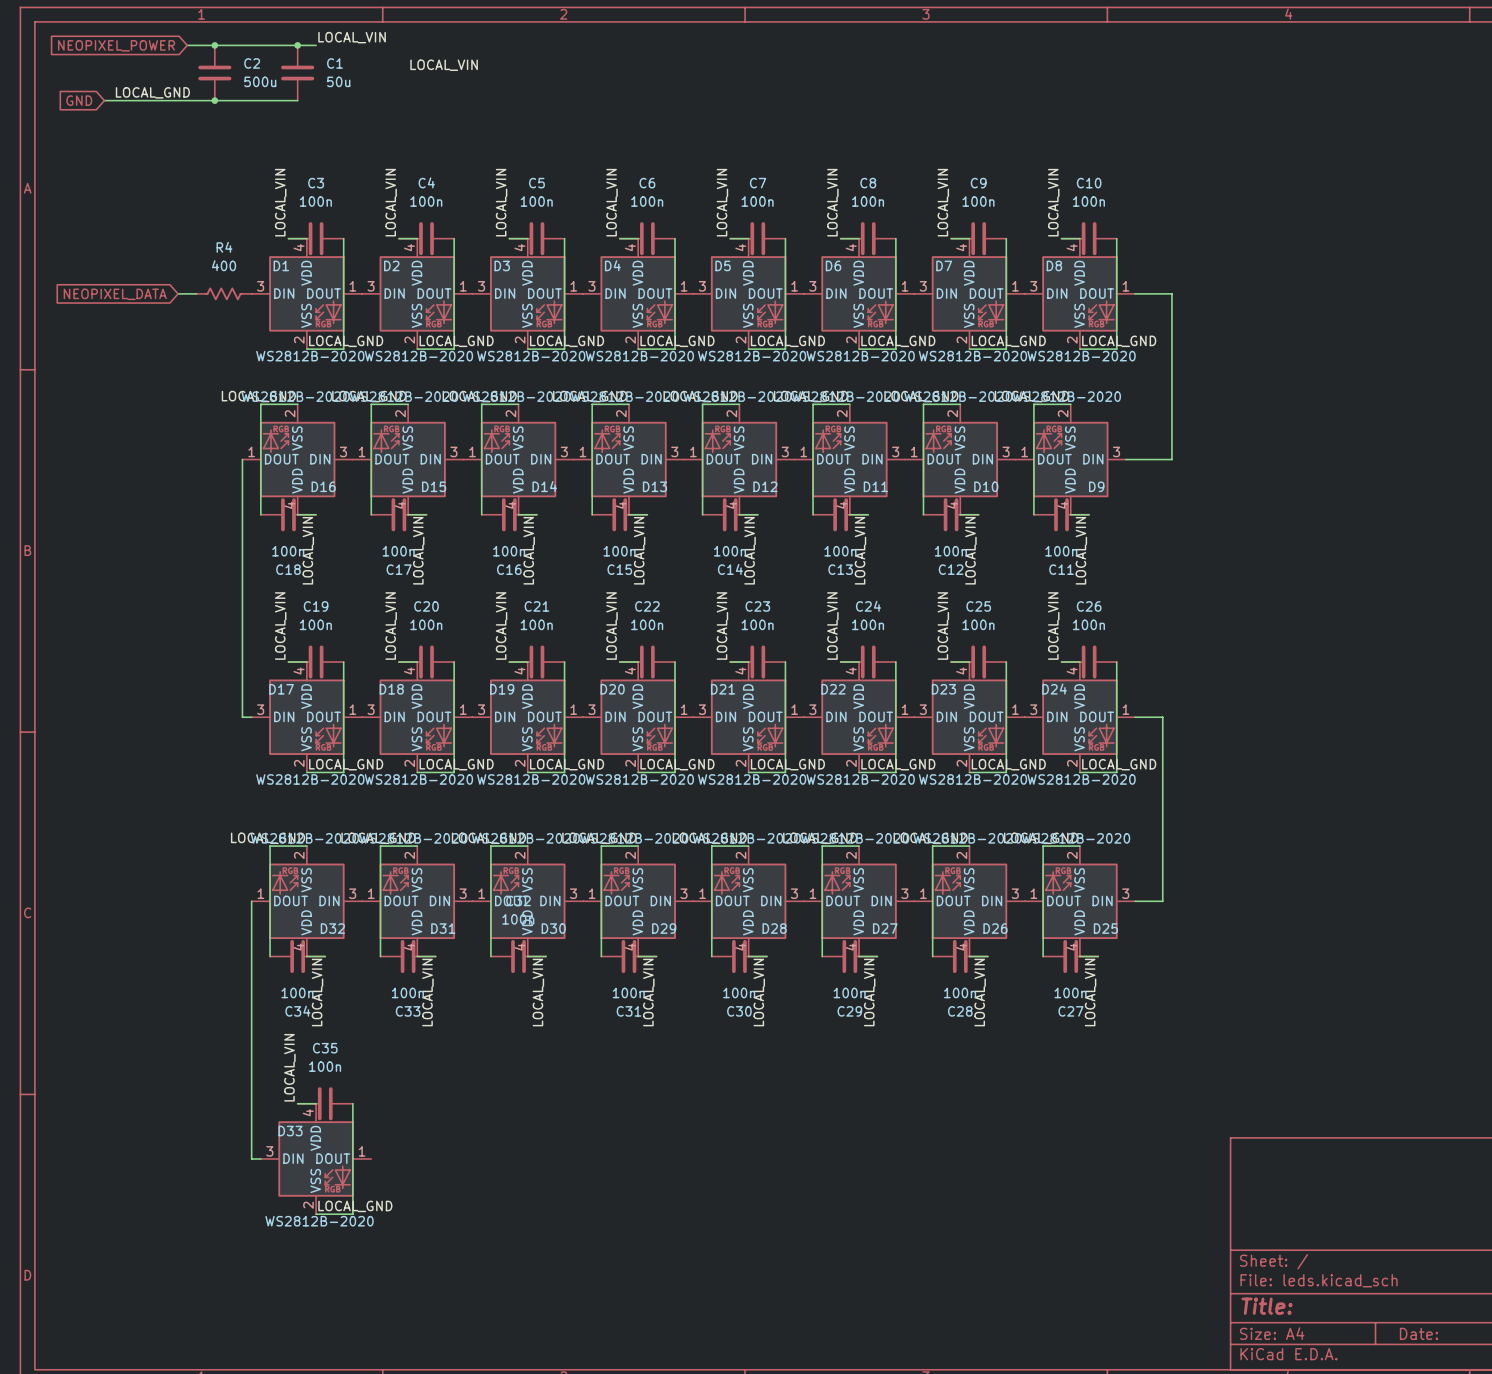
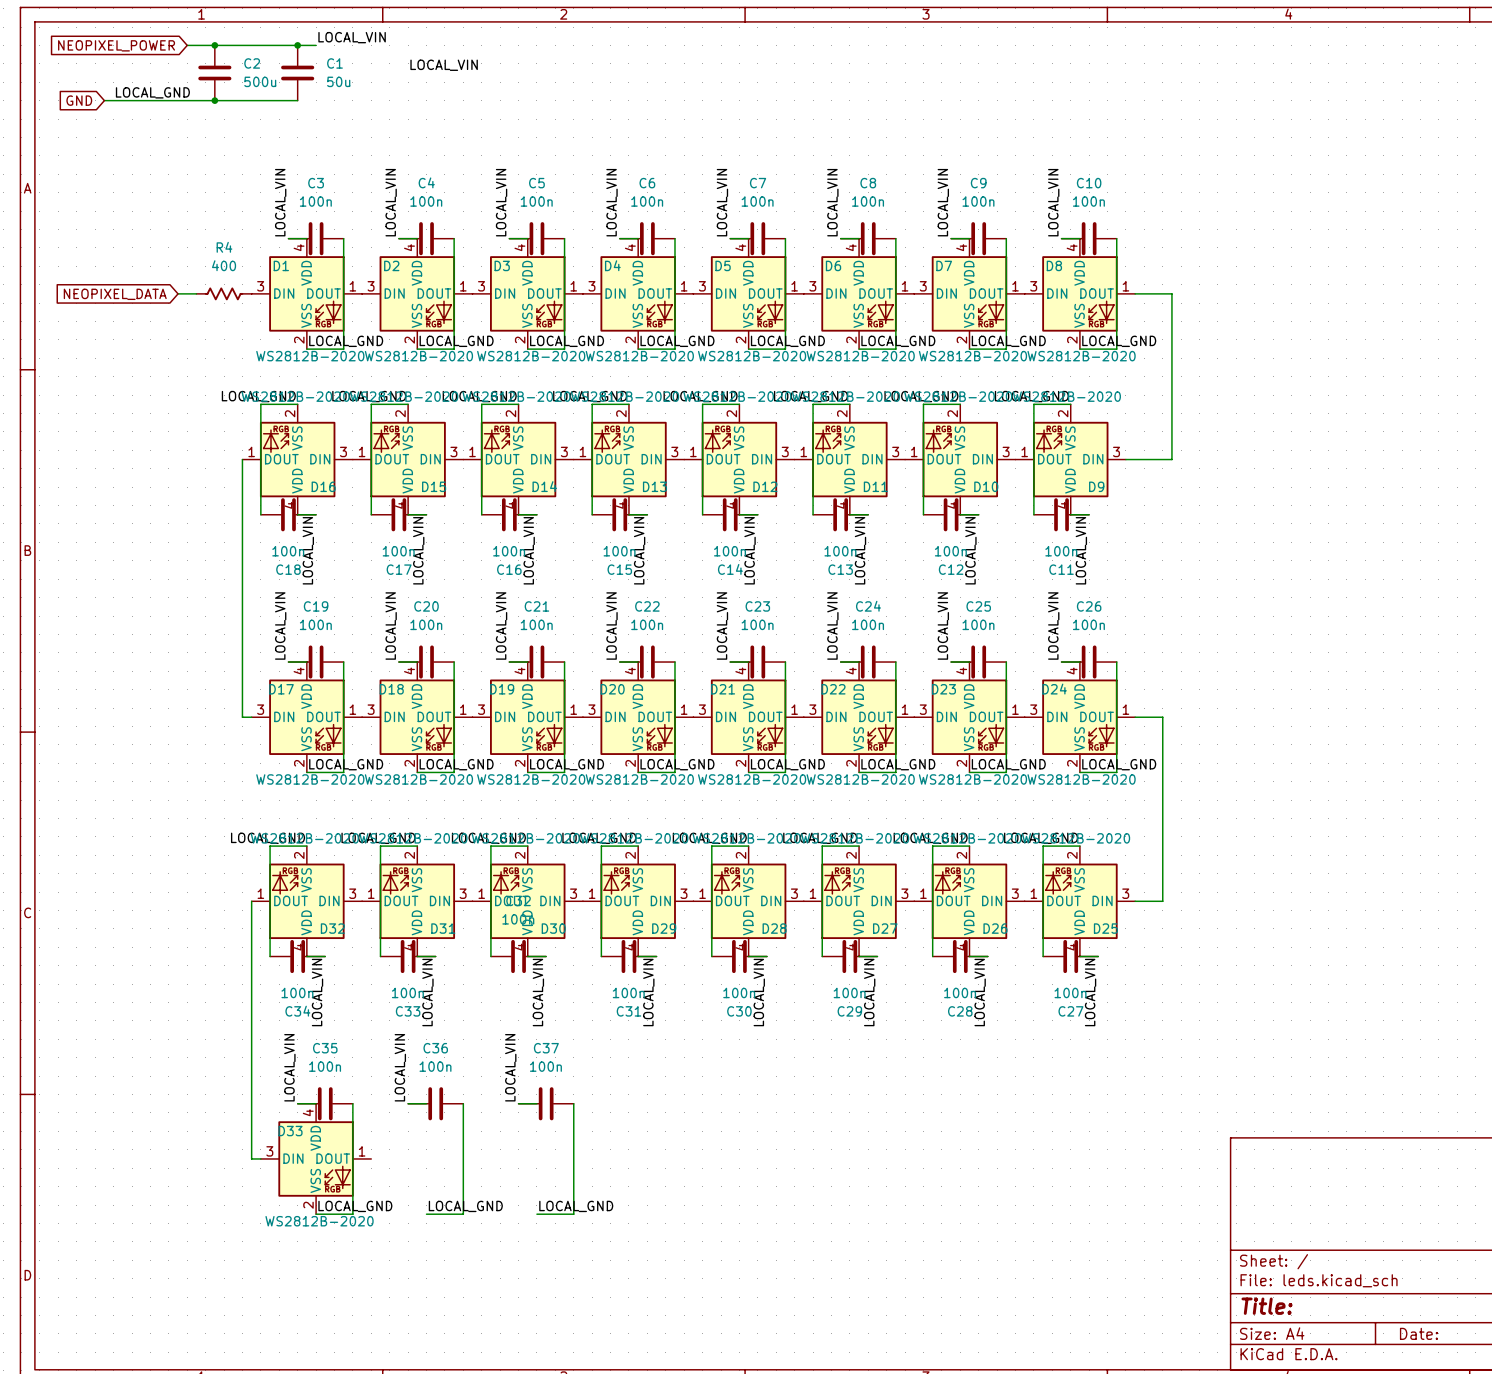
label: none -> LOCAL_VIN (400, 1067)
label: none -> LOCAL_VIN (510, 1067)
wire: none -> (408, 1103) (426, 1103)
C36: none -> 100n (435, 1103)
wire: none -> (463, 1103) (463, 1214) (426, 1214)
wire: none -> (518, 1103) (536, 1103)
C37: none -> 100n (546, 1103)
wire: none -> (573, 1103) (573, 1214) (536, 1214)
label: none -> LOCAL_GND (465, 1206)
label: none -> LOCAL_GND (576, 1206)

